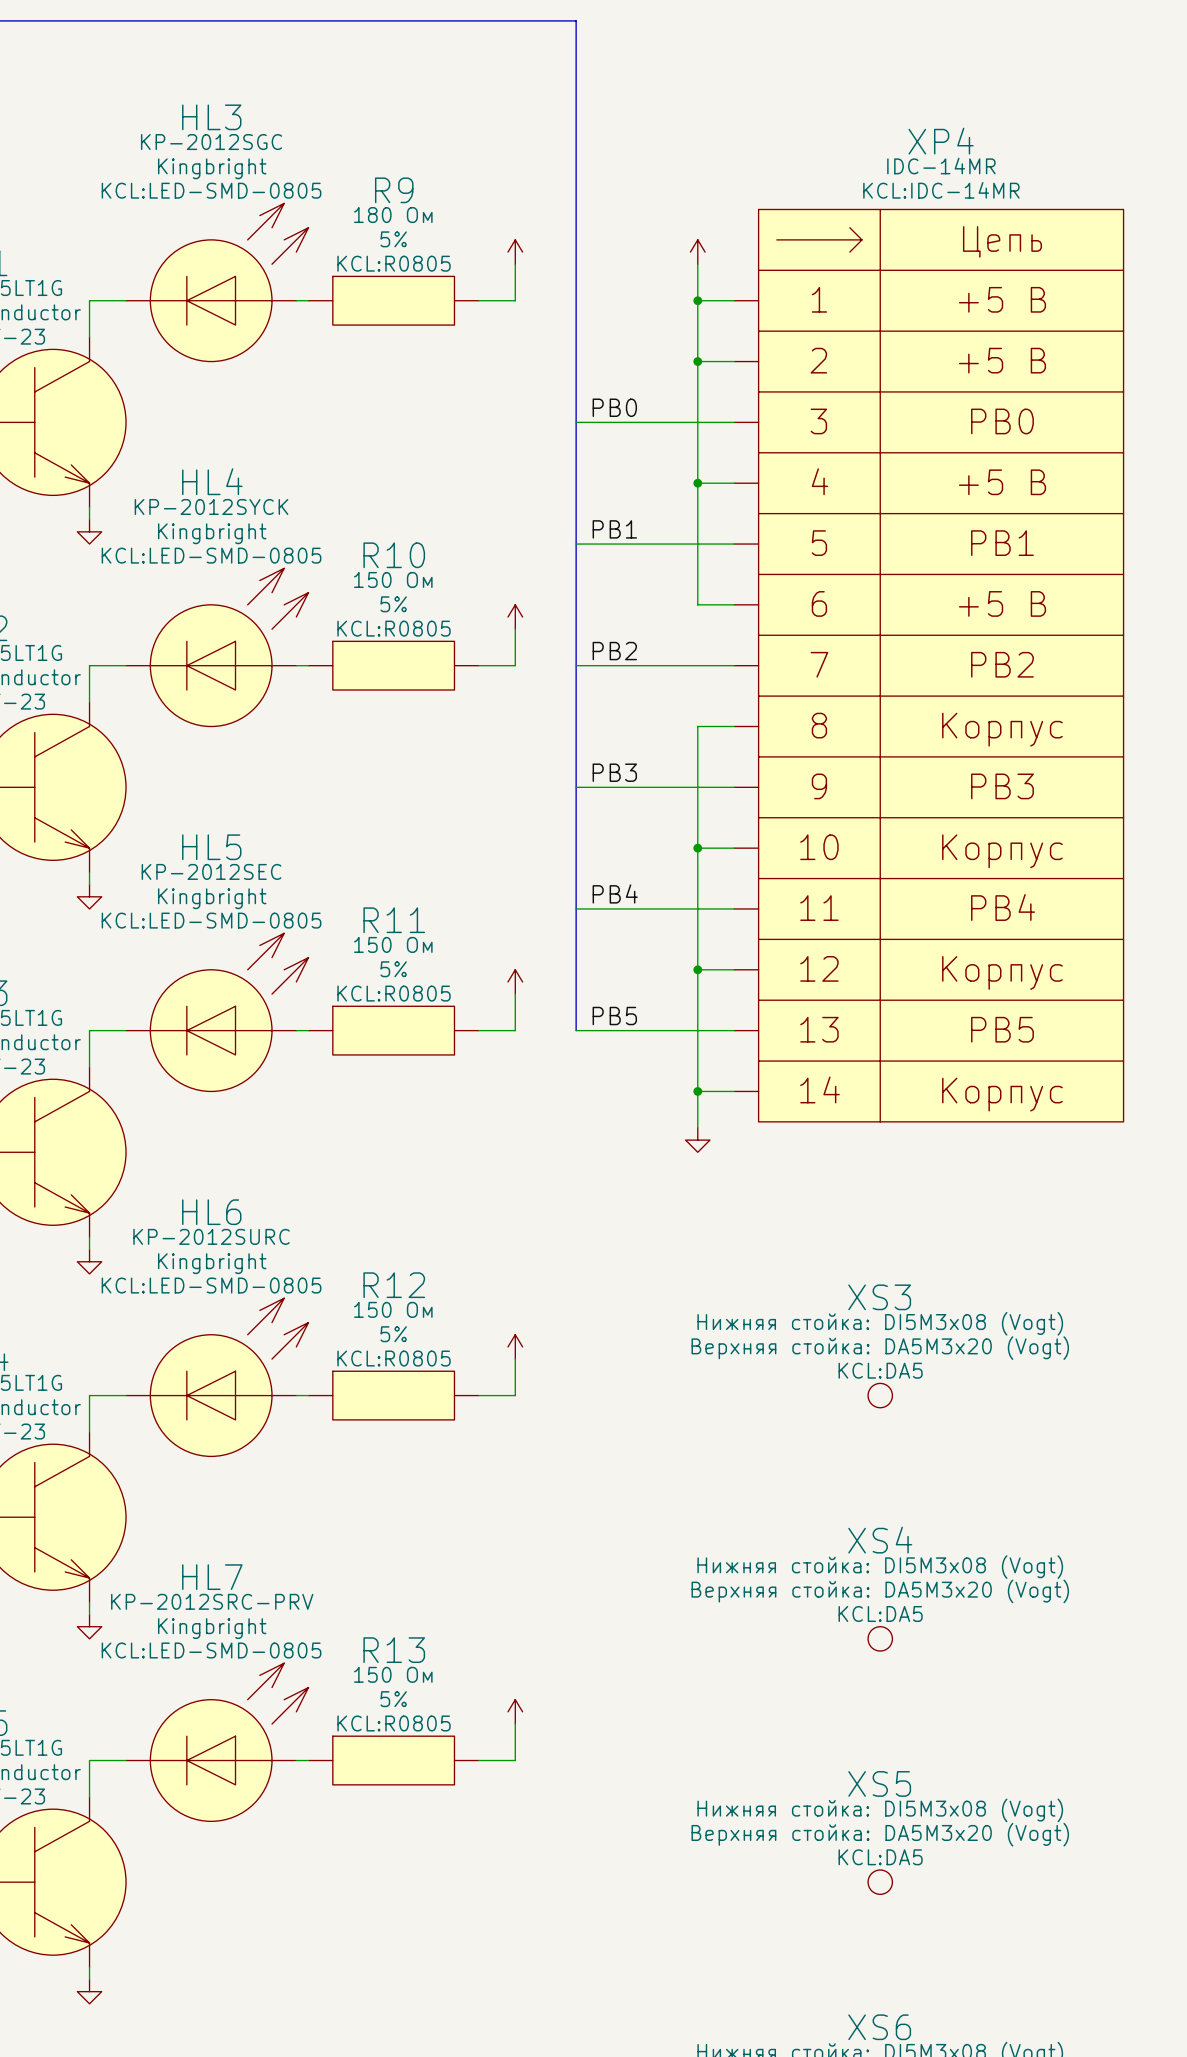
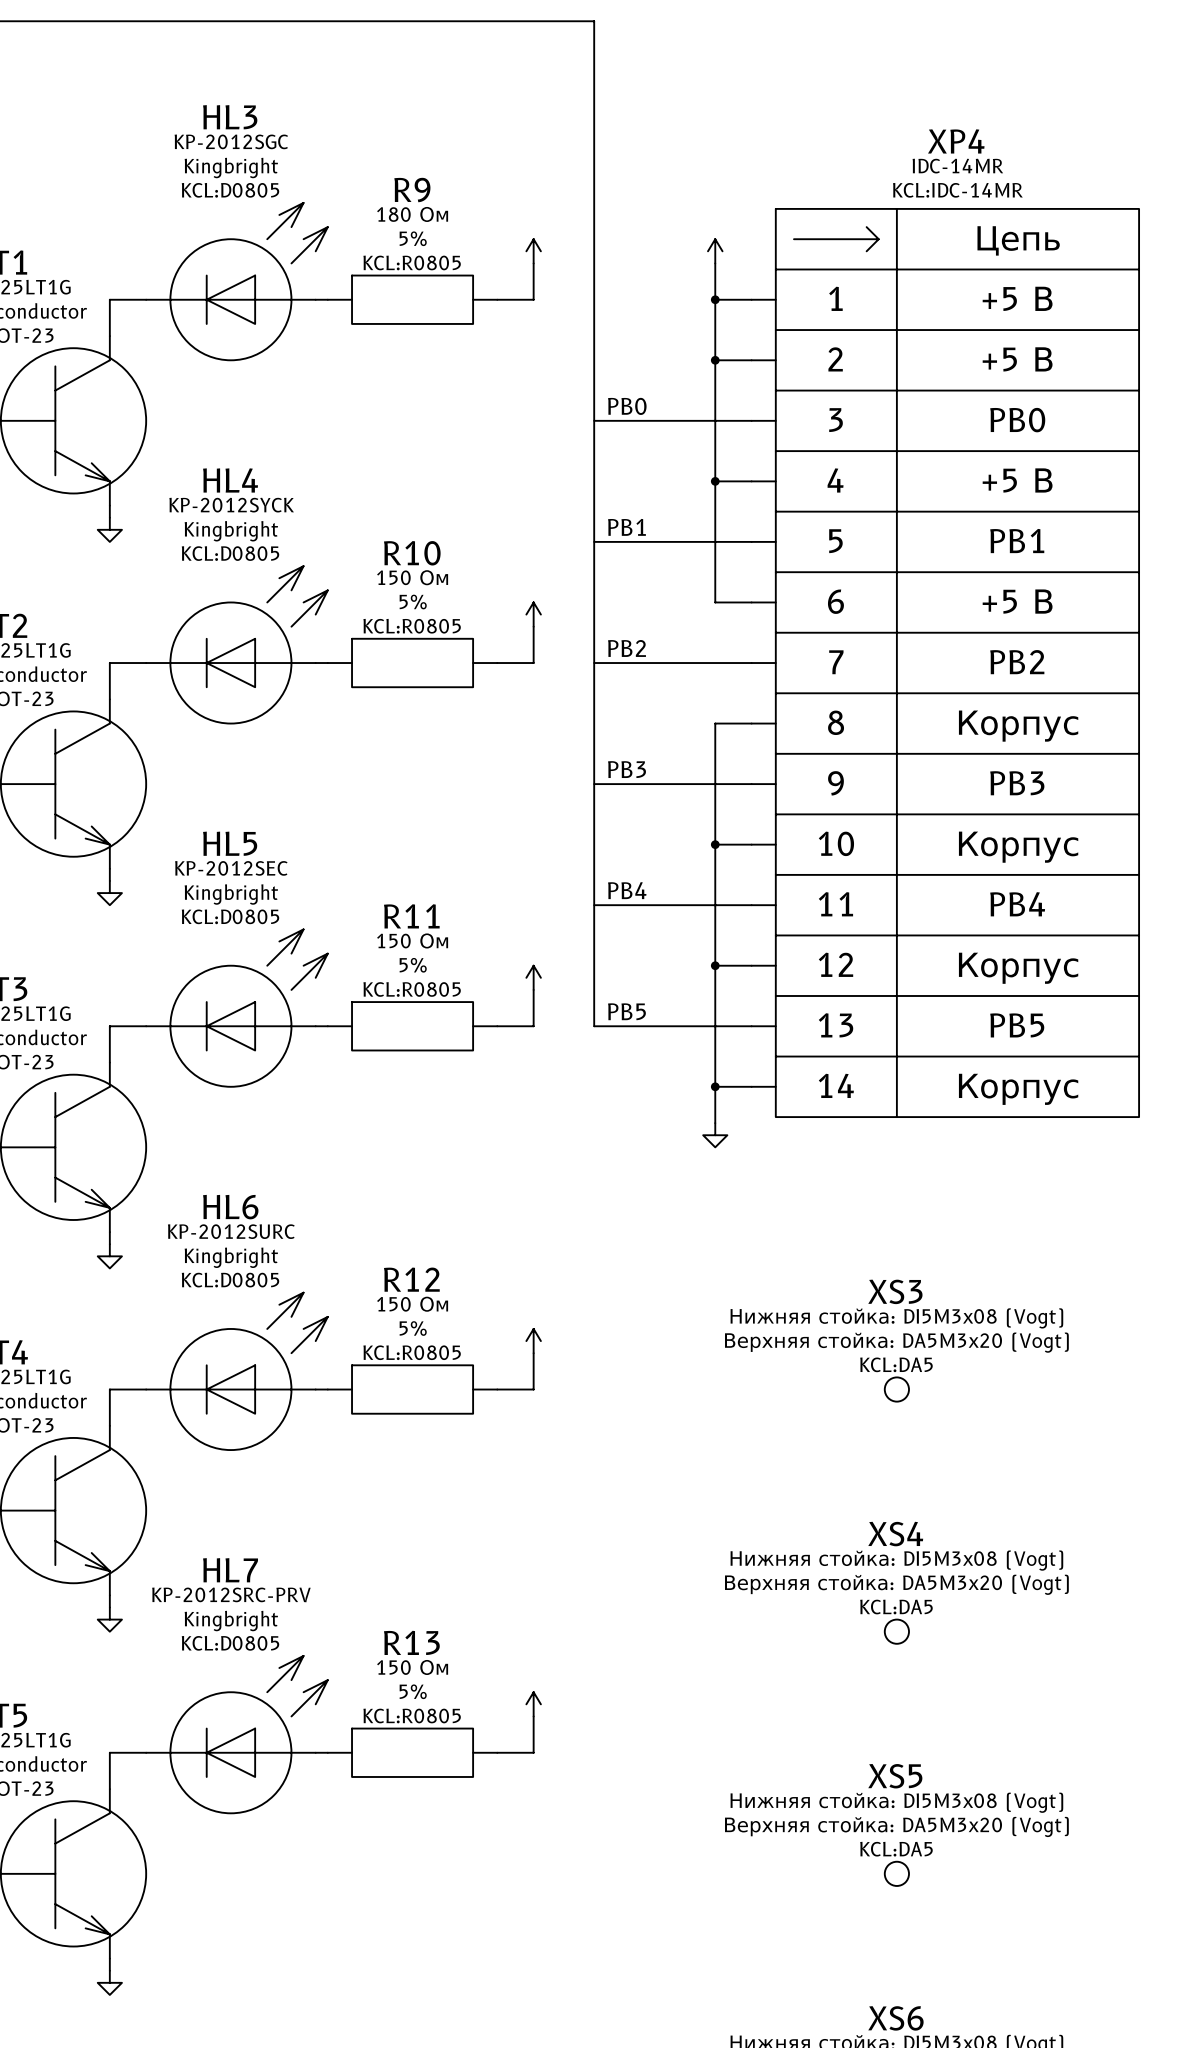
HL3 text: KCL:LED-SMD-0805 (211, 190) -> KCL:D0805 (230, 190)
HL4 text: KCL:LED-SMD-0805 (211, 555) -> KCL:D0805 (230, 553)
HL5 text: KCL:LED-SMD-0805 (211, 920) -> KCL:D0805 (230, 916)
HL6 text: KCL:LED-SMD-0805 (211, 1285) -> KCL:D0805 (230, 1280)
HL7 text: KCL:LED-SMD-0805 (211, 1650) -> KCL:D0805 (230, 1643)

